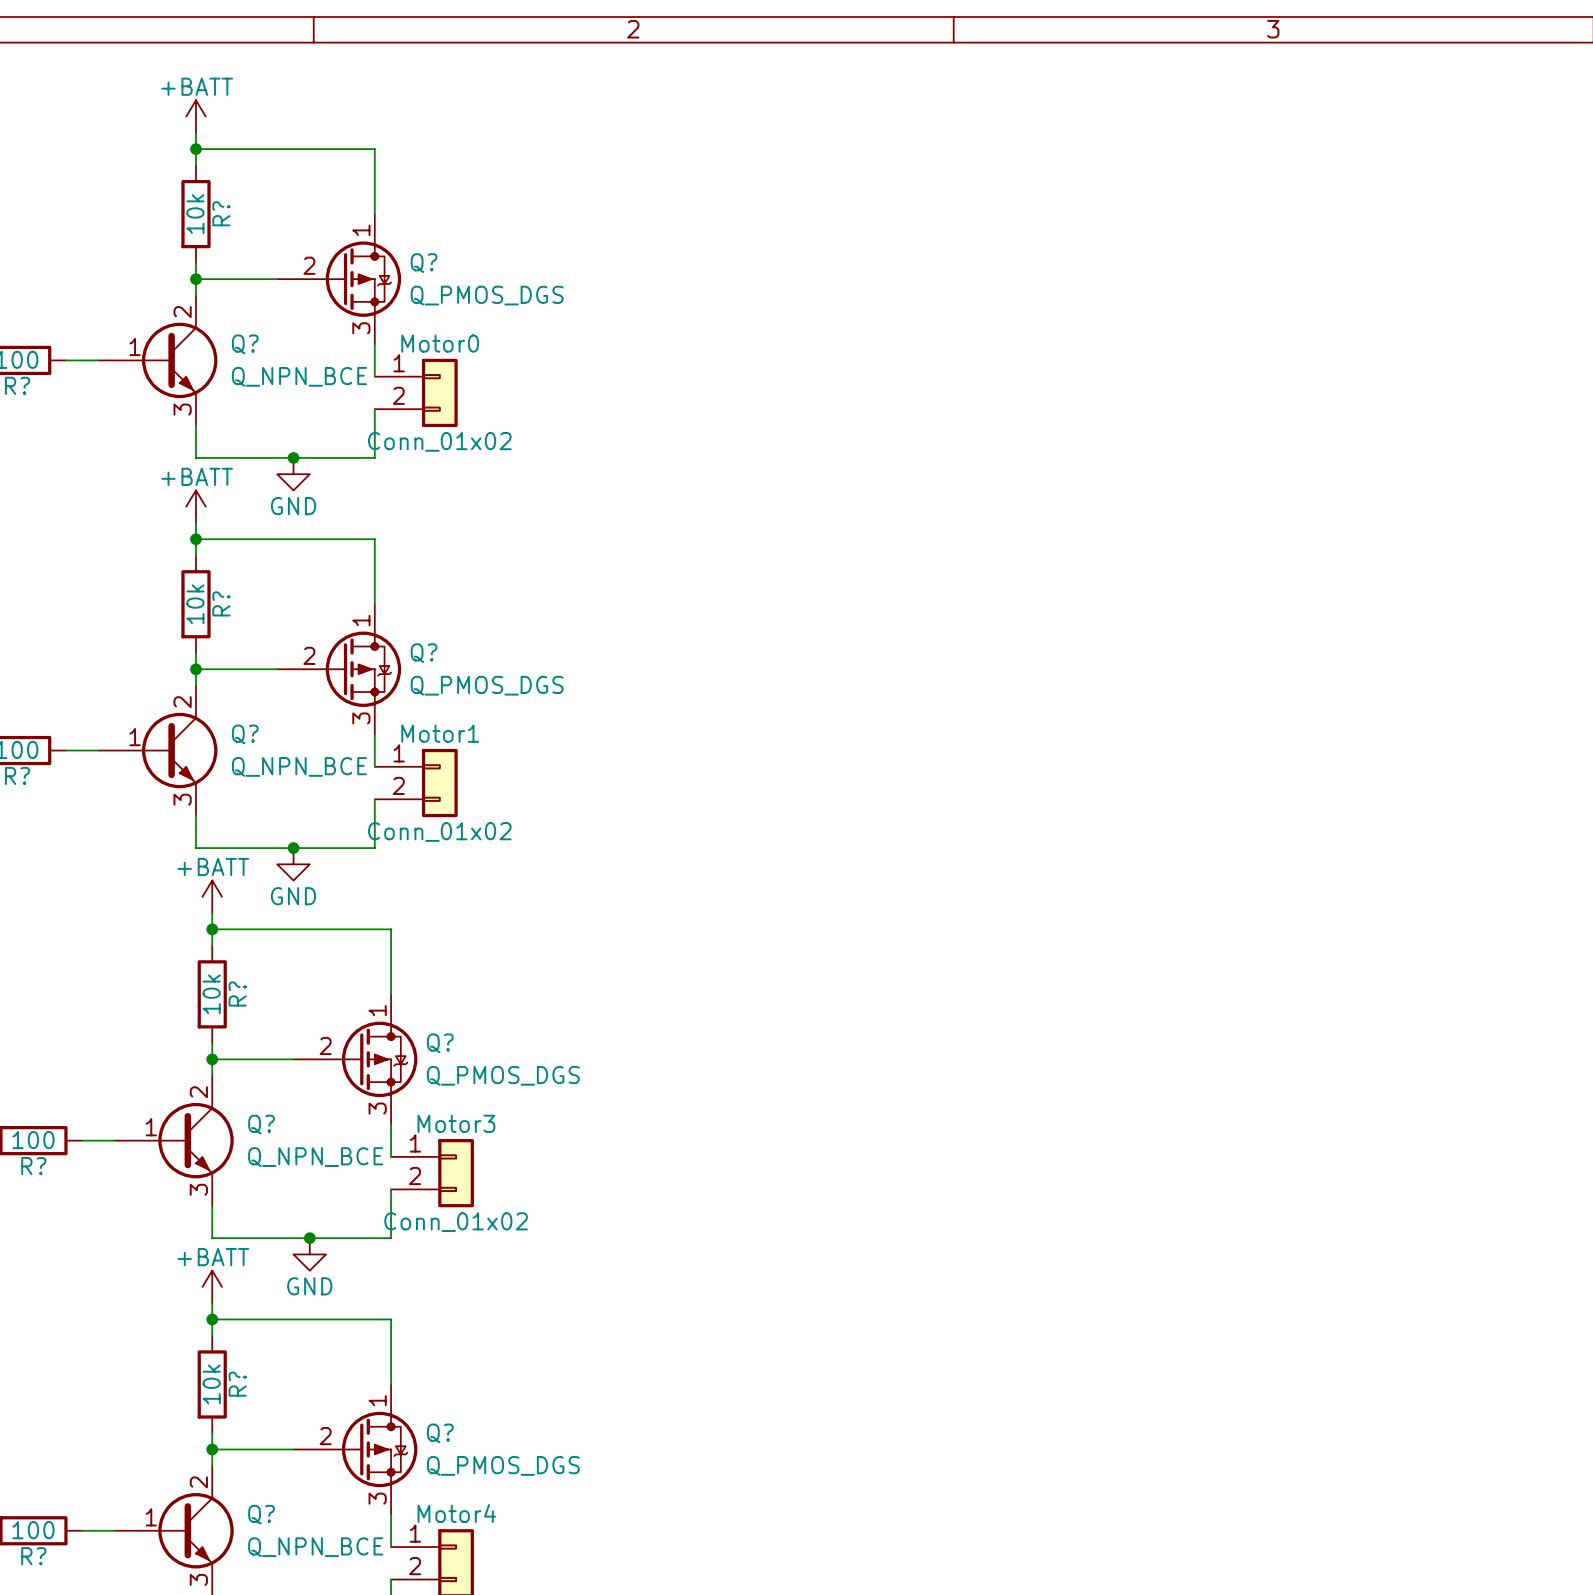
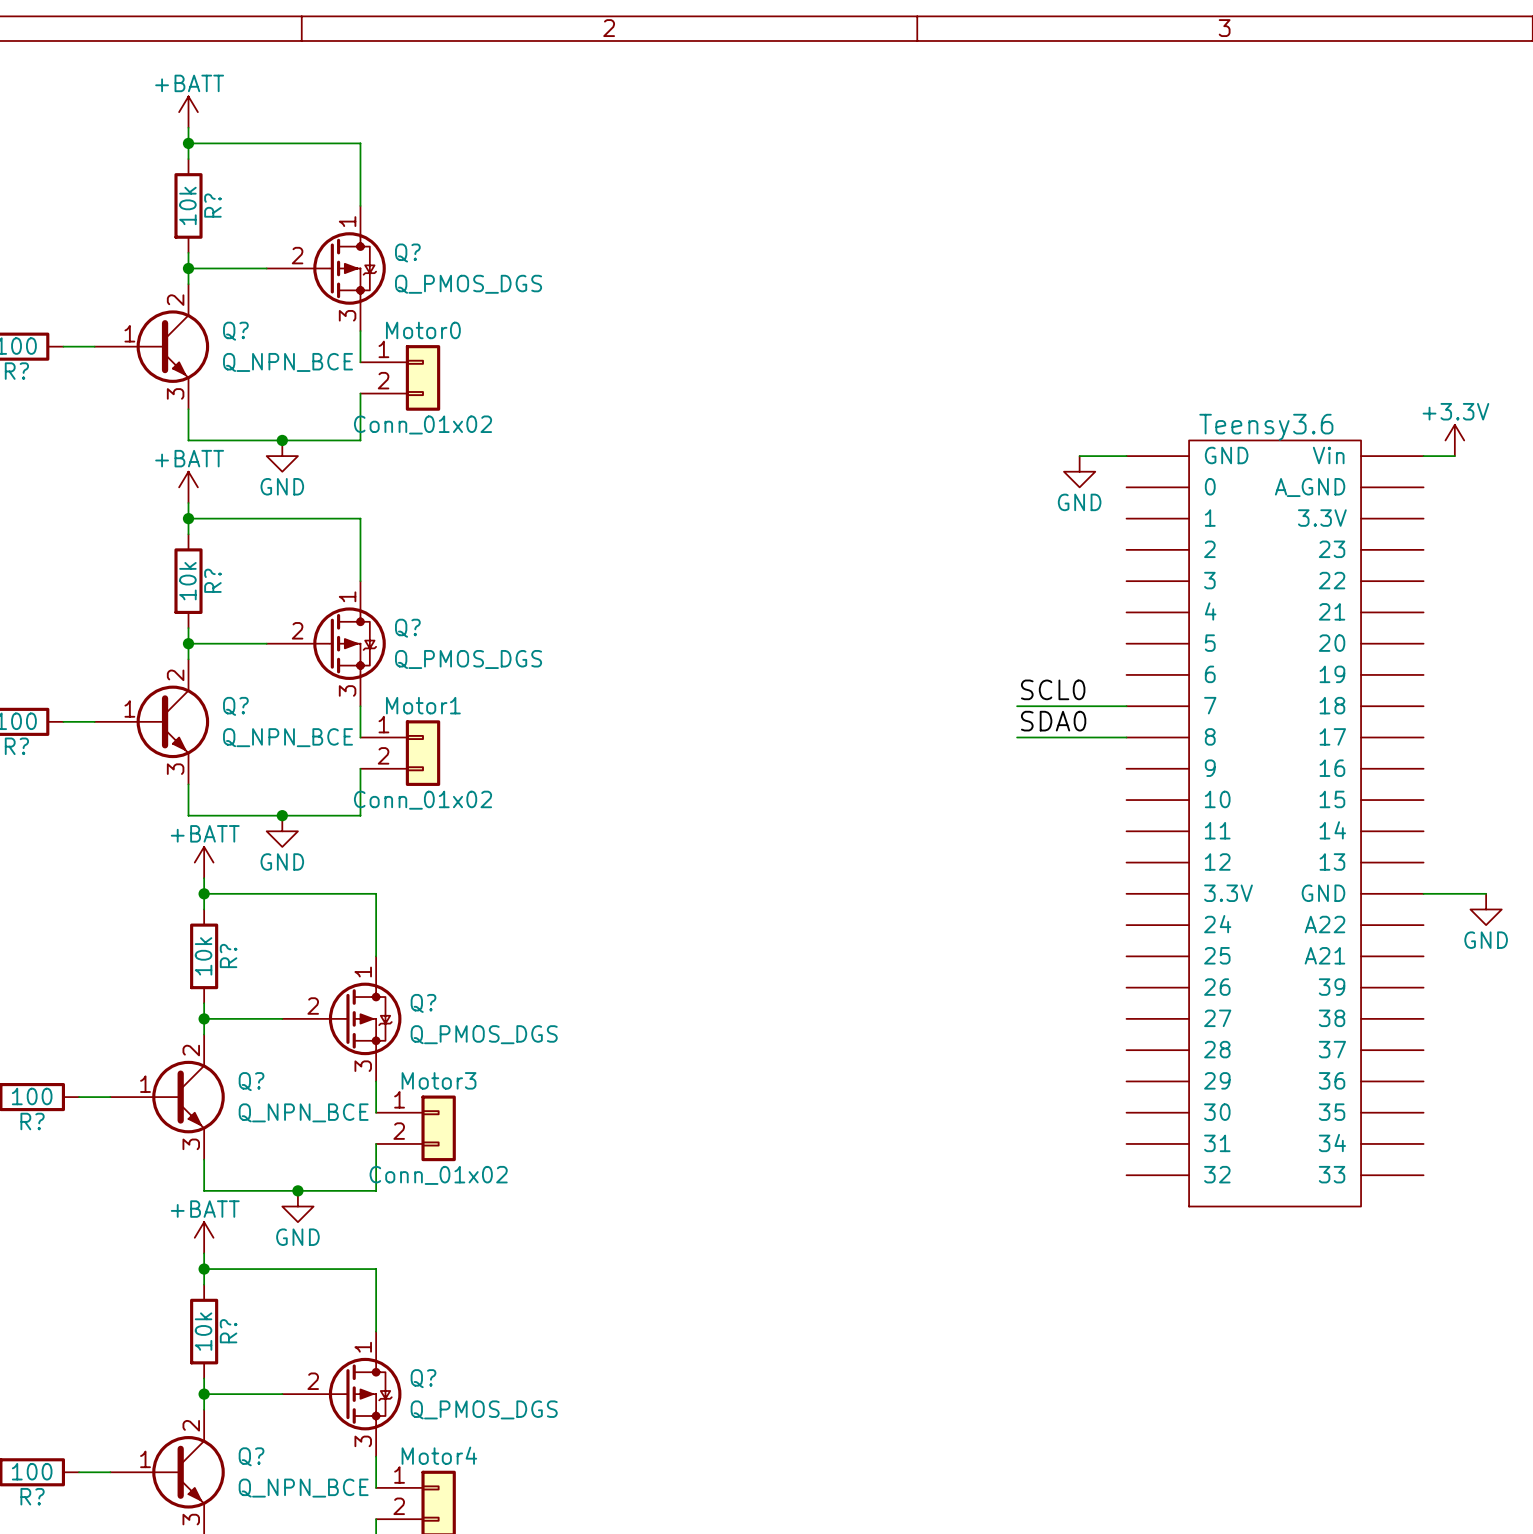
power symbol: none -> +3.3V (1454, 440)
wire: none -> (1079, 456) (1126, 456)
wire: none -> (1423, 456) (1454, 456)
power symbol: none -> GND (1079, 471)
label: none -> SCL0 (1053, 689)
wire: none -> (1017, 706) (1126, 706)
label: none -> SDA0 (1053, 721)
wire: none -> (1017, 737) (1126, 737)
Teensy3.6: none -> (1275, 823)
wire: none -> (1423, 893) (1486, 893)
power symbol: none -> GND (1486, 909)

